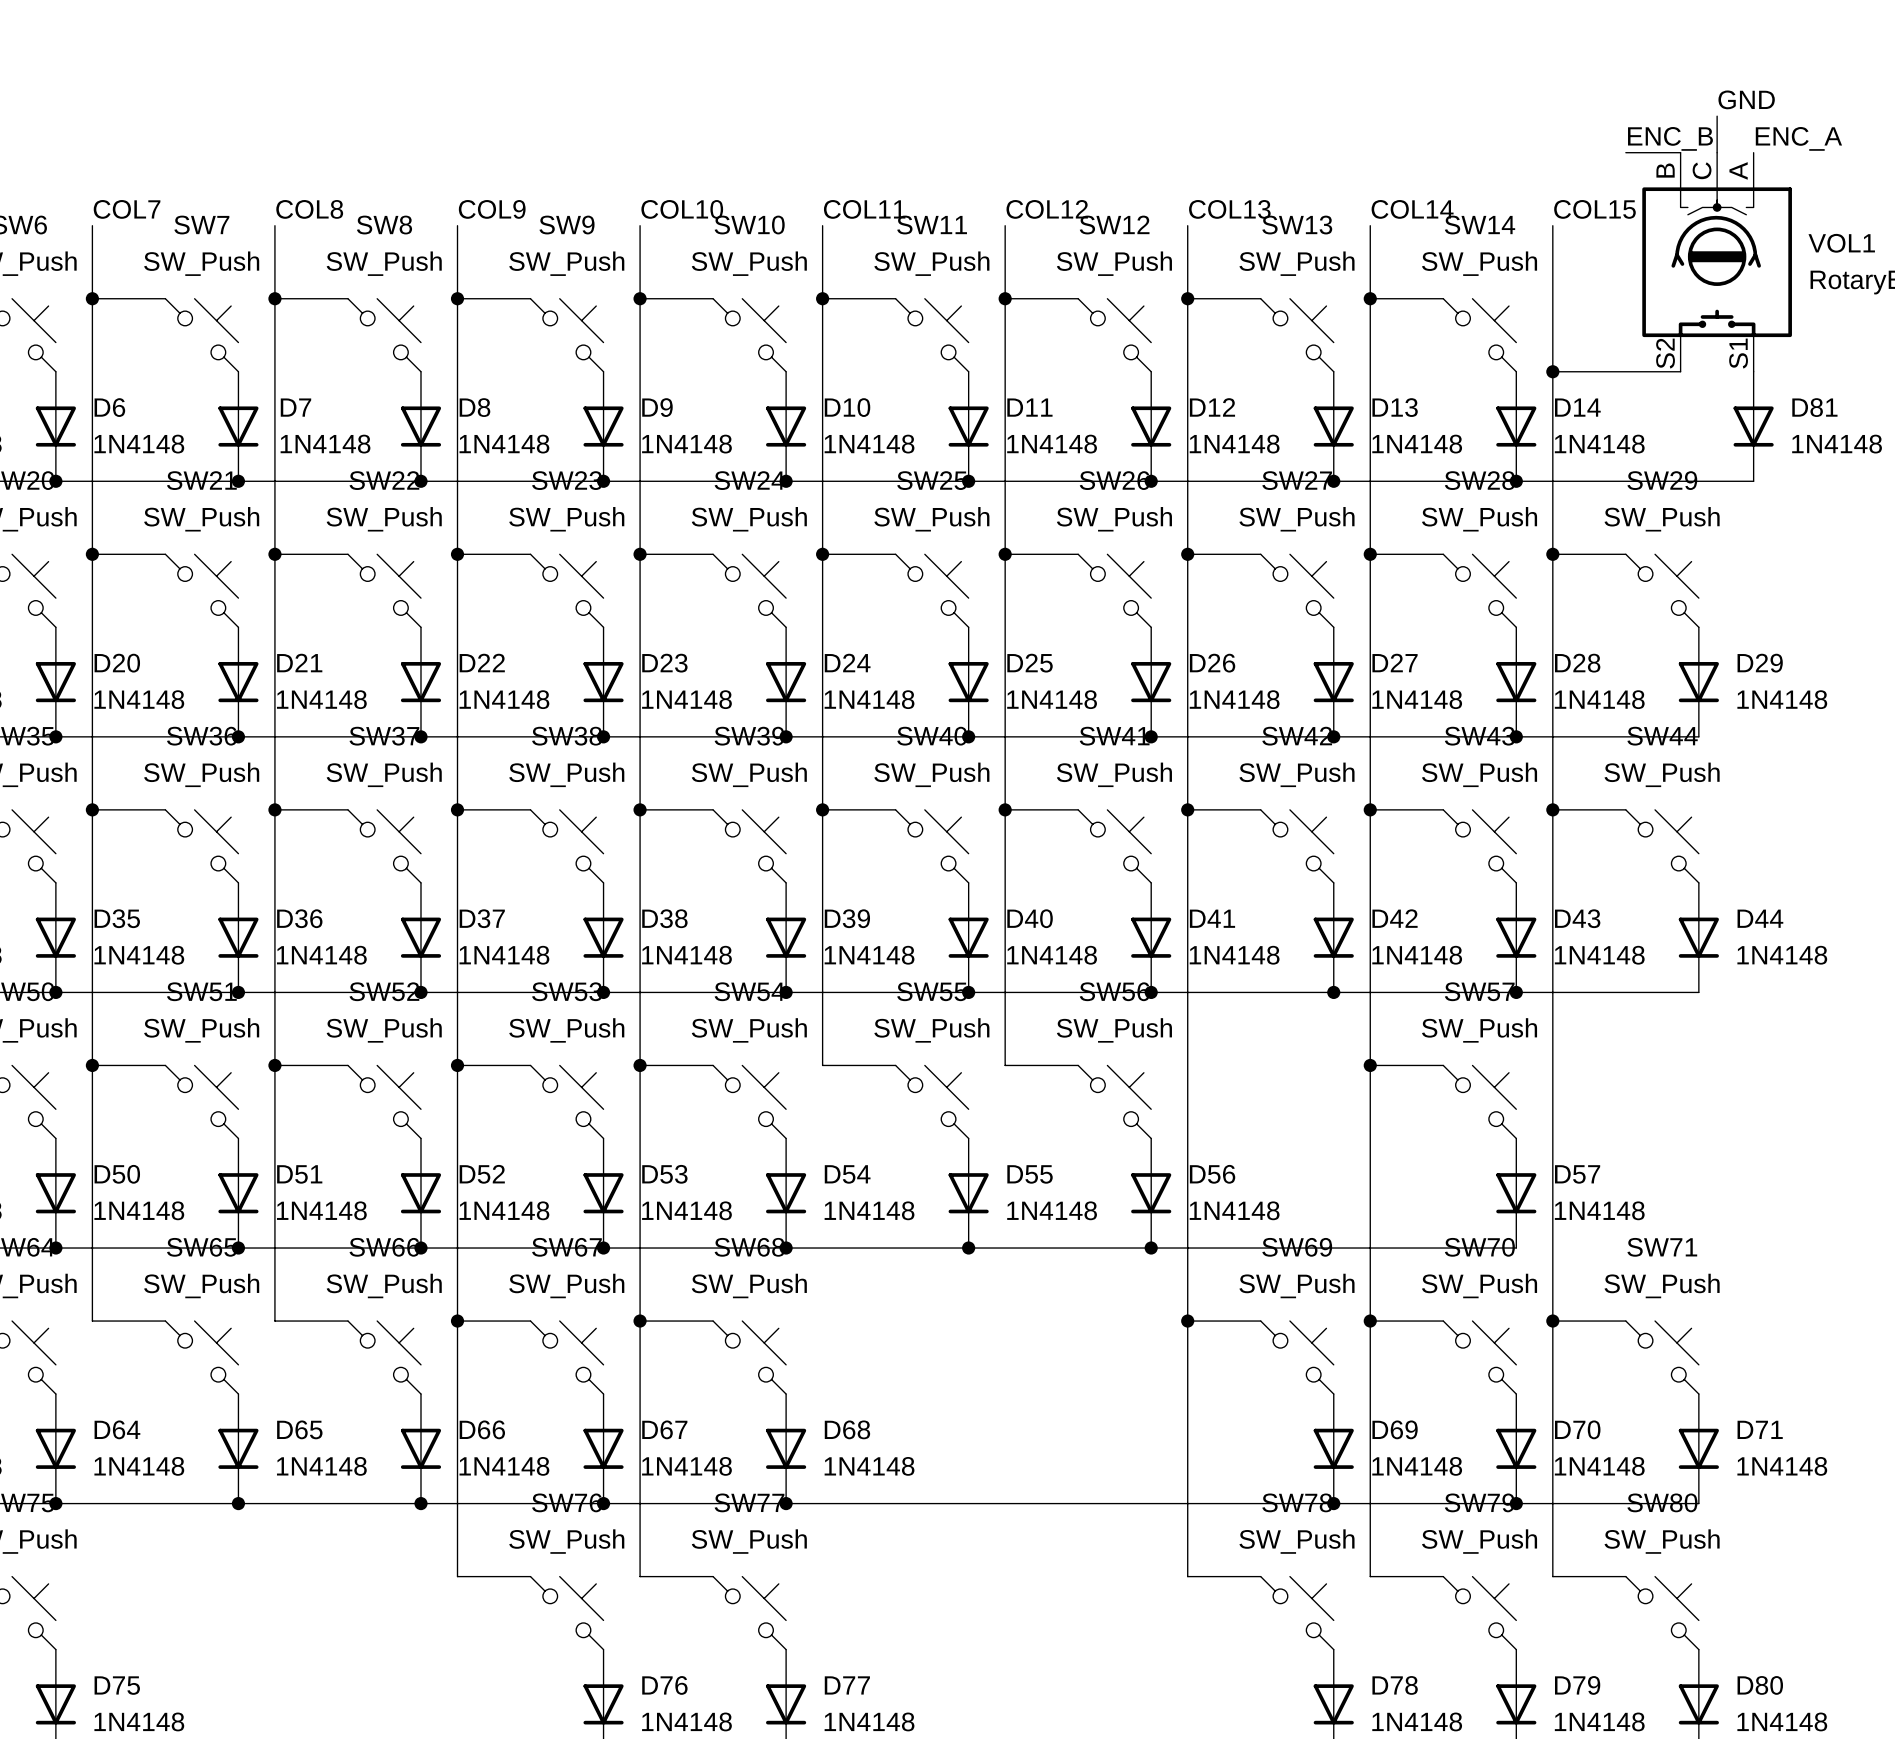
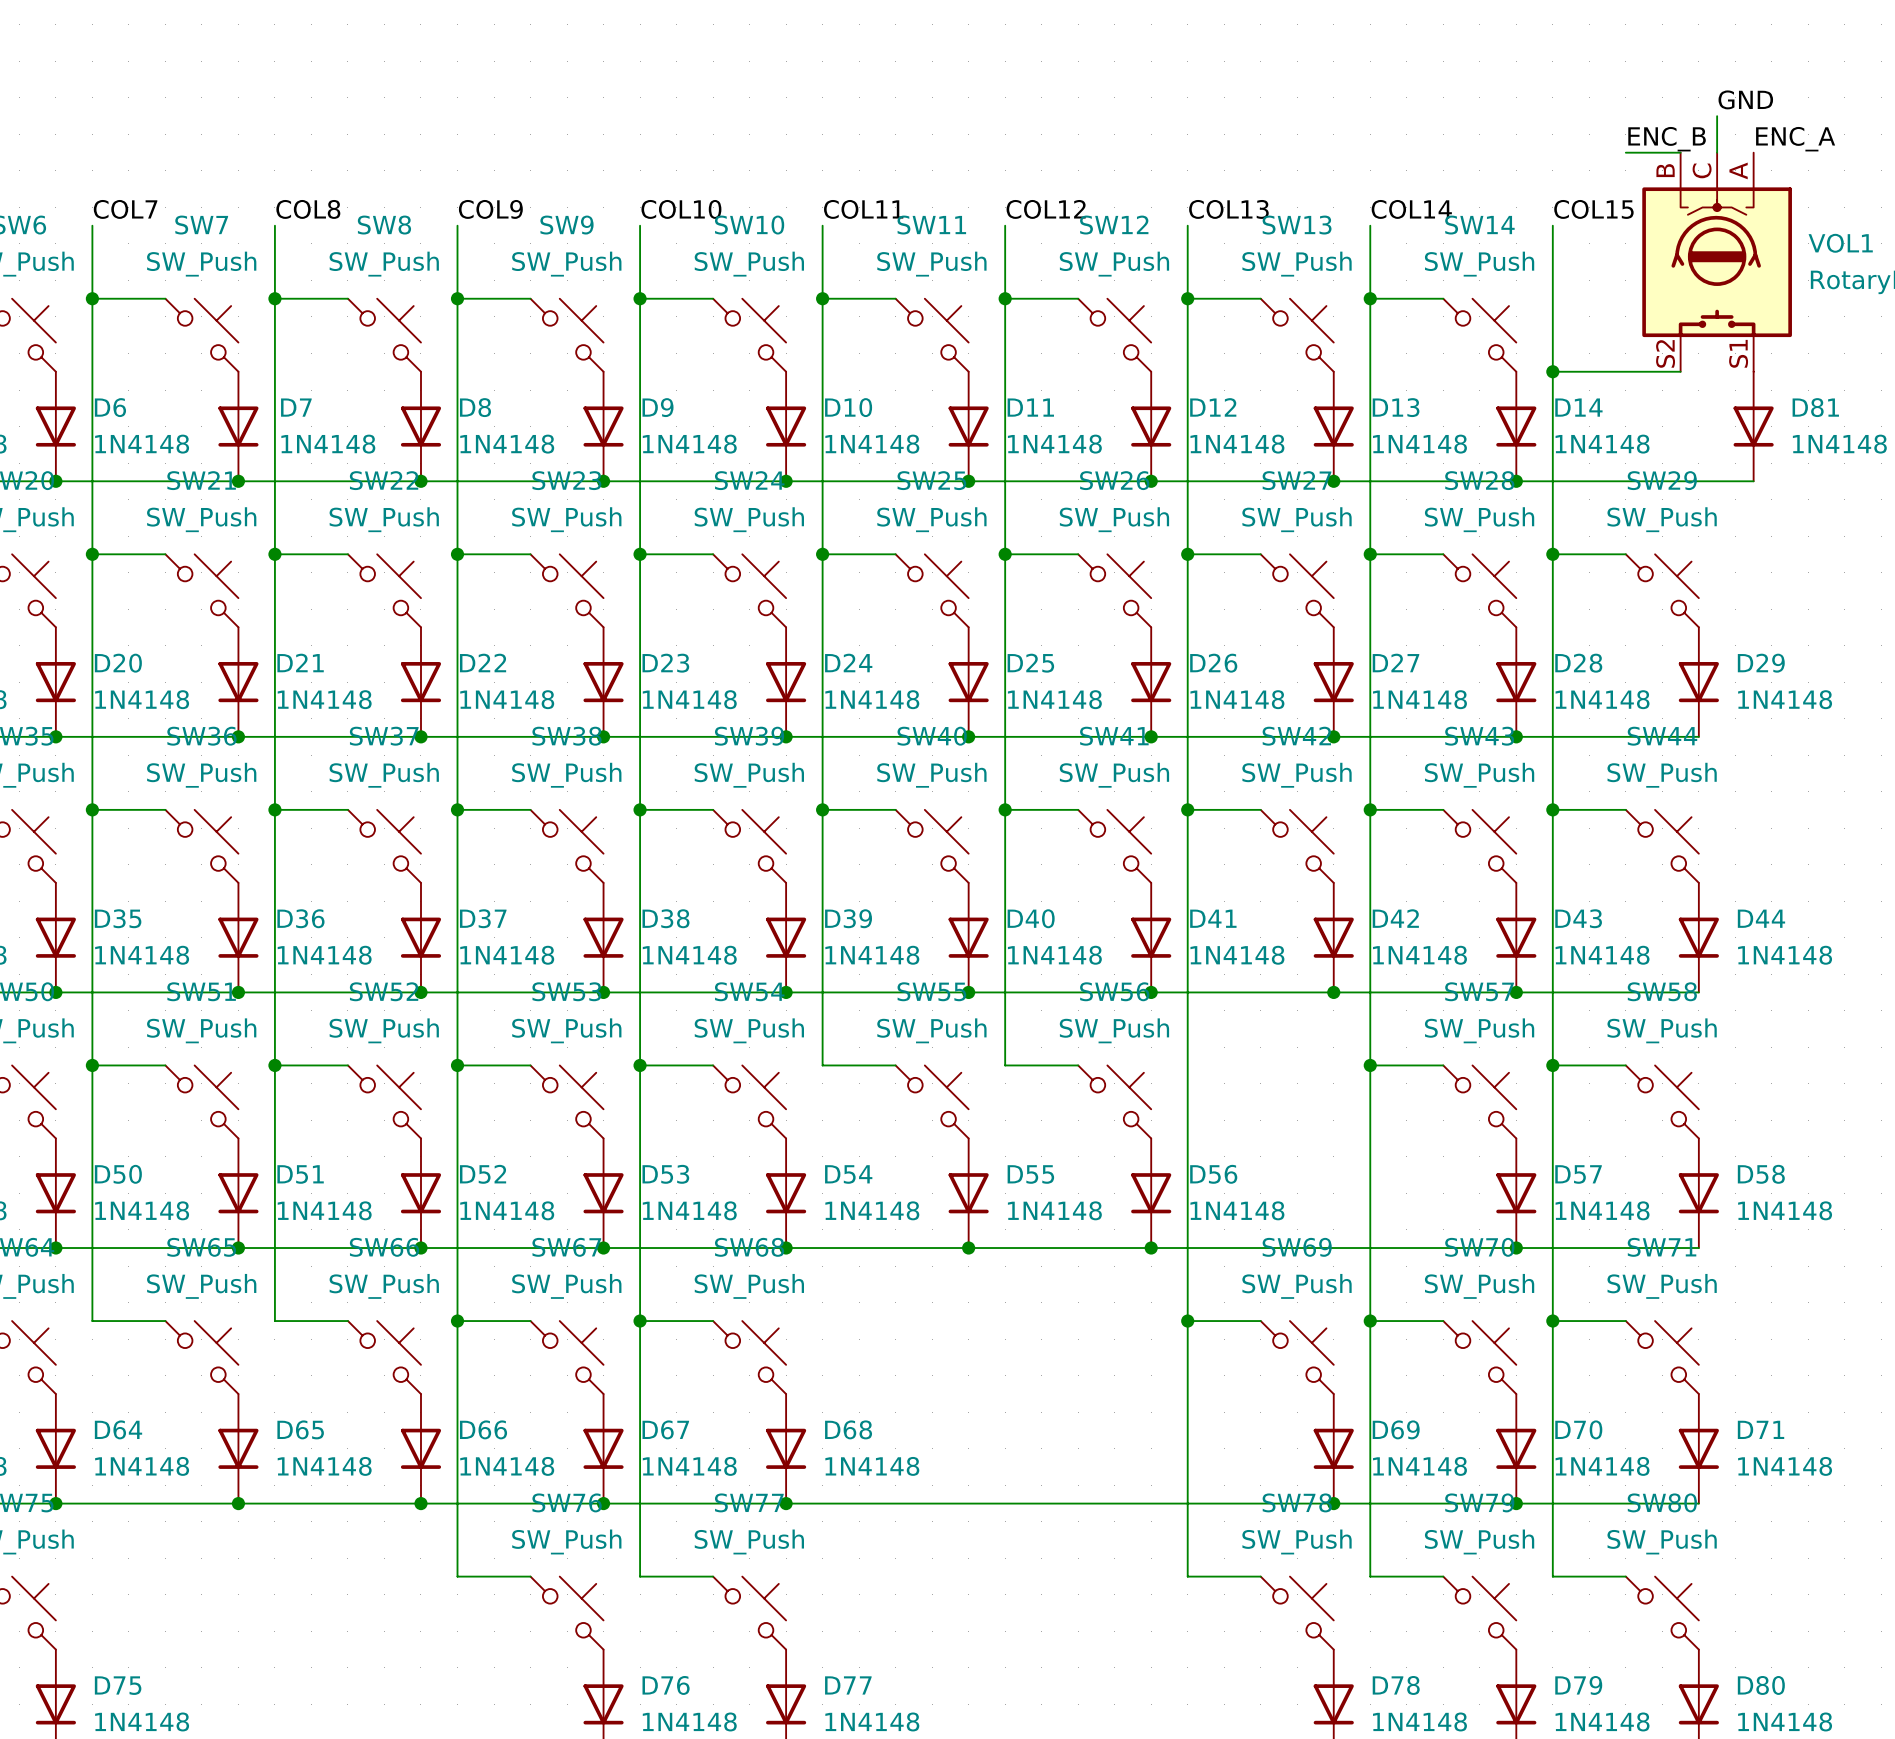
wire: none -> (1552, 1065) (1625, 1065)
junction: none -> (1552, 1065)
SW58: none -> SW_Push (1662, 1101)
D58: none -> 1N4148 (1698, 1193)
wire: none -> (1516, 1248) (1698, 1248)
junction: none -> (1516, 1248)

